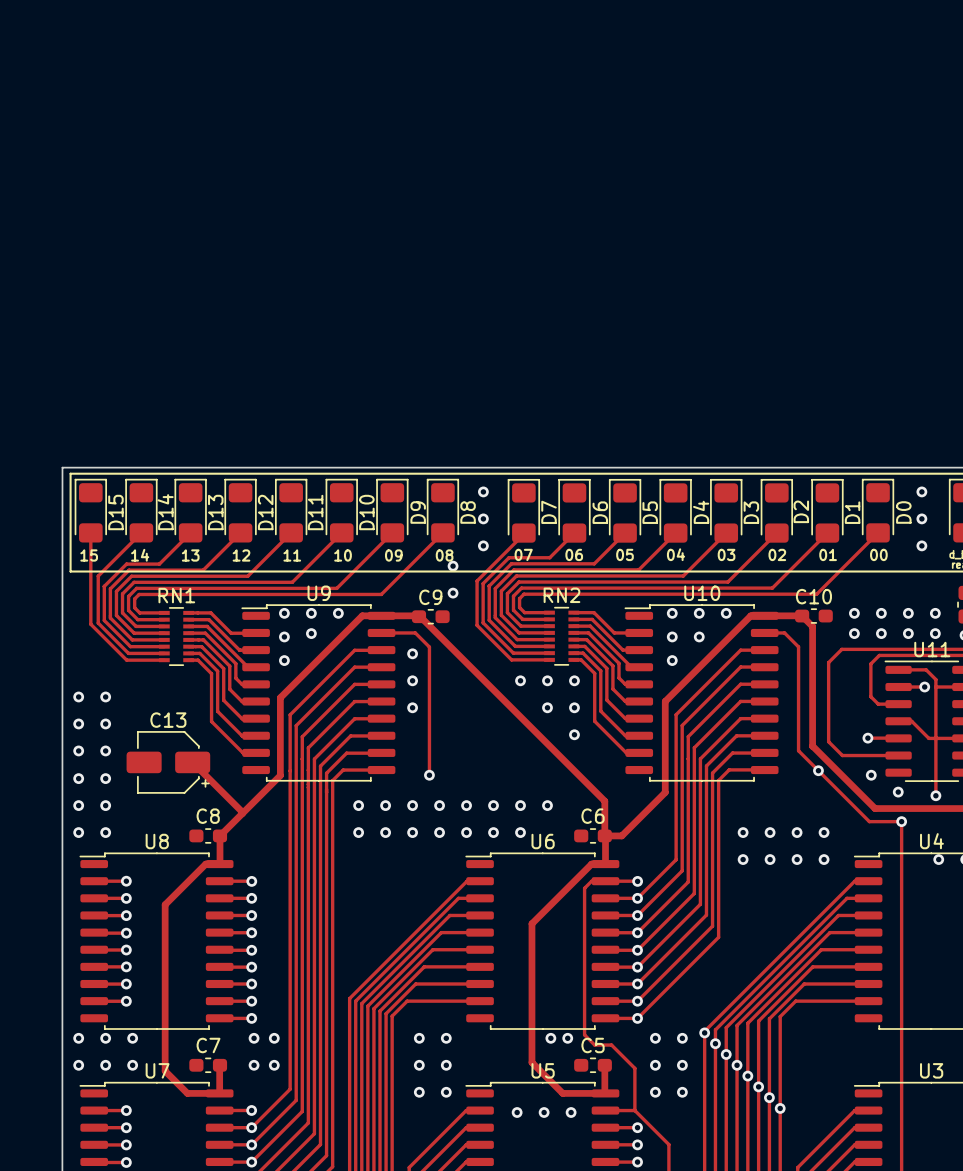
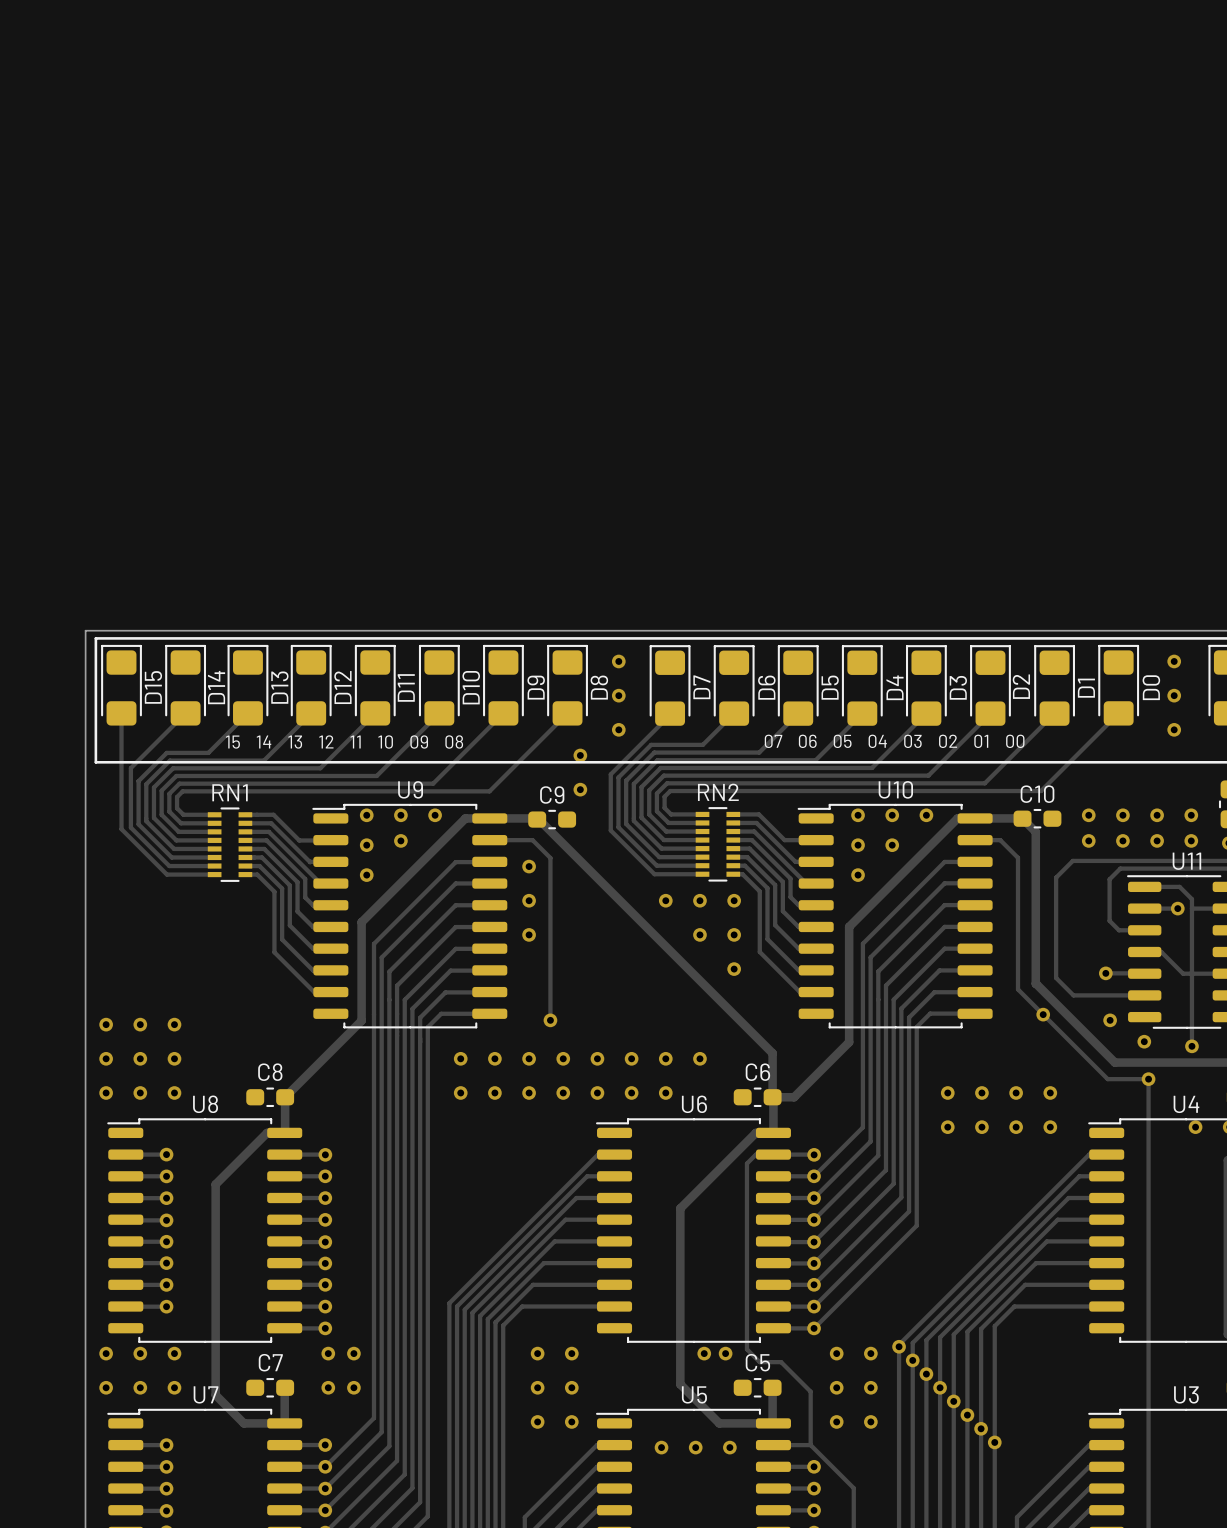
via: (78, 696) -> none
via: (105, 696) -> none
via: (78, 723) -> none
via: (105, 723) -> none
via: (78, 750) -> none
via: (105, 750) -> none
C13: (168, 762) -> none
track: (192, 762) (242, 813) -> none
via: none -> (174, 1024)
via: none -> (174, 1058)
via: none -> (174, 1092)

